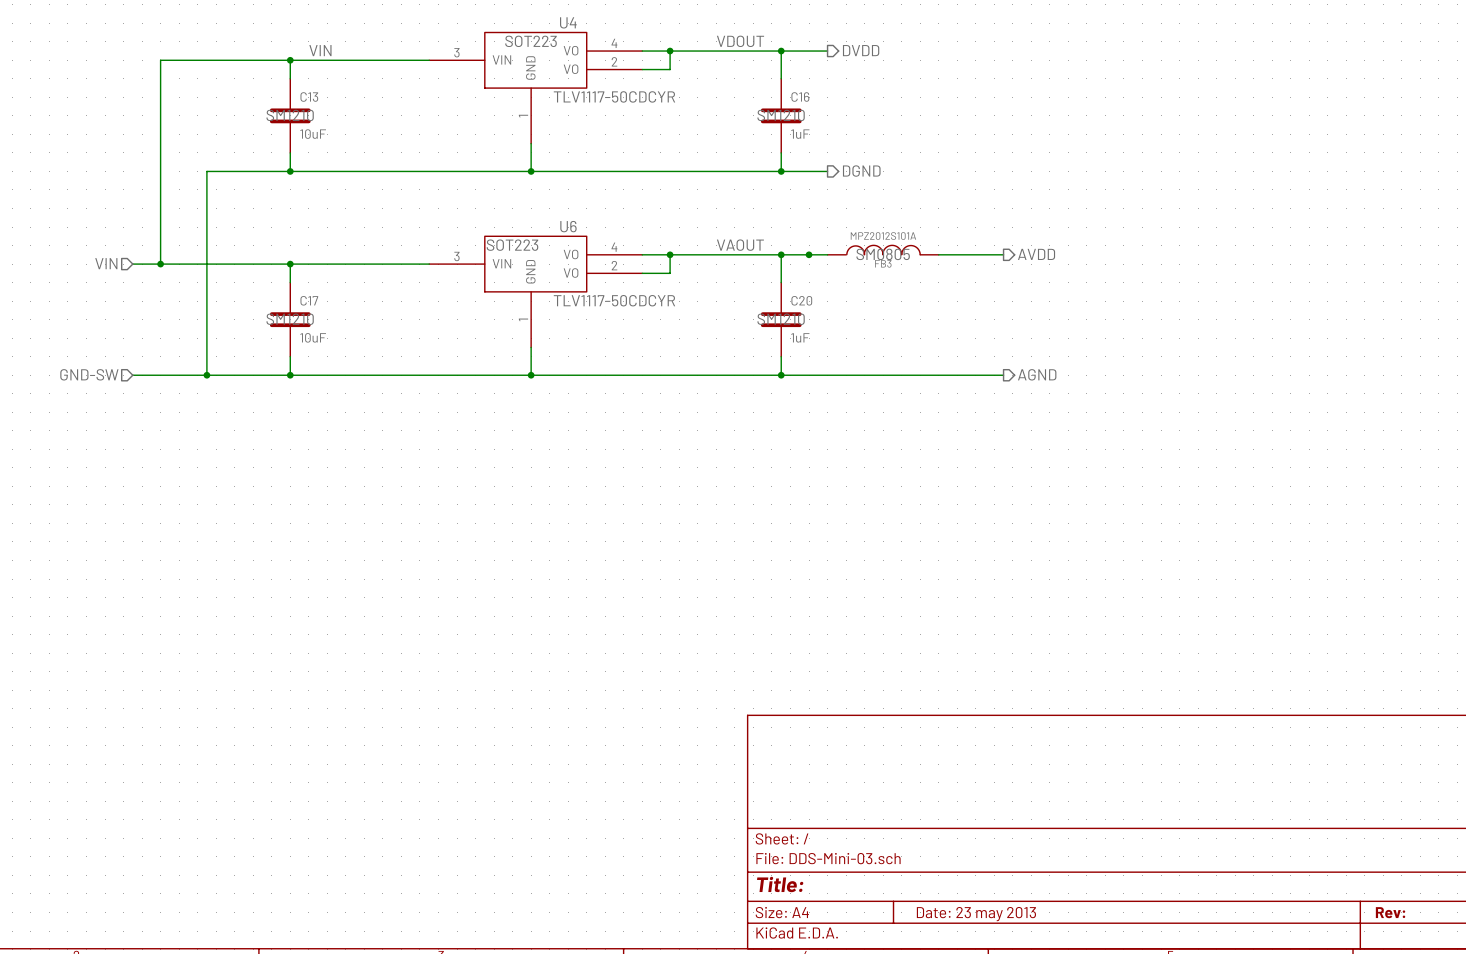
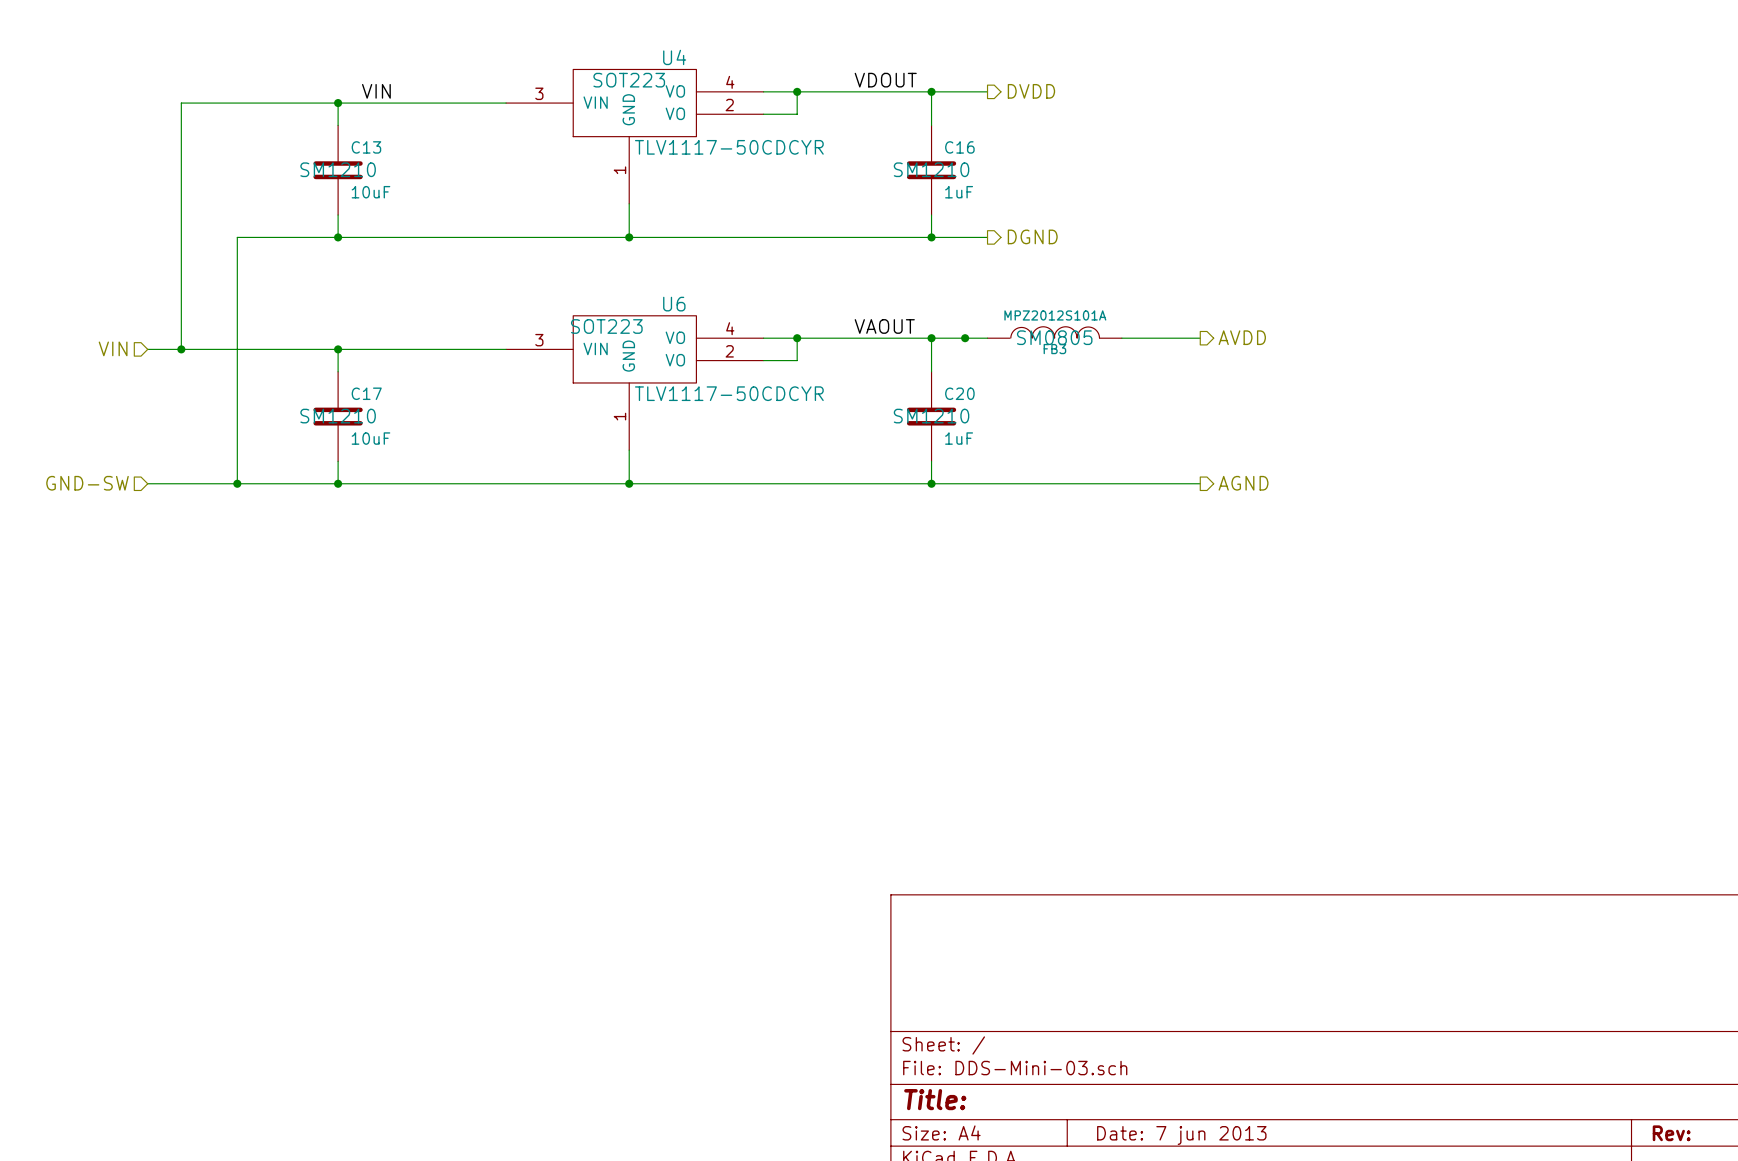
title block: Date: 23 may 2013 (976, 914) -> Date: 7 jun 2013 (1181, 1135)

